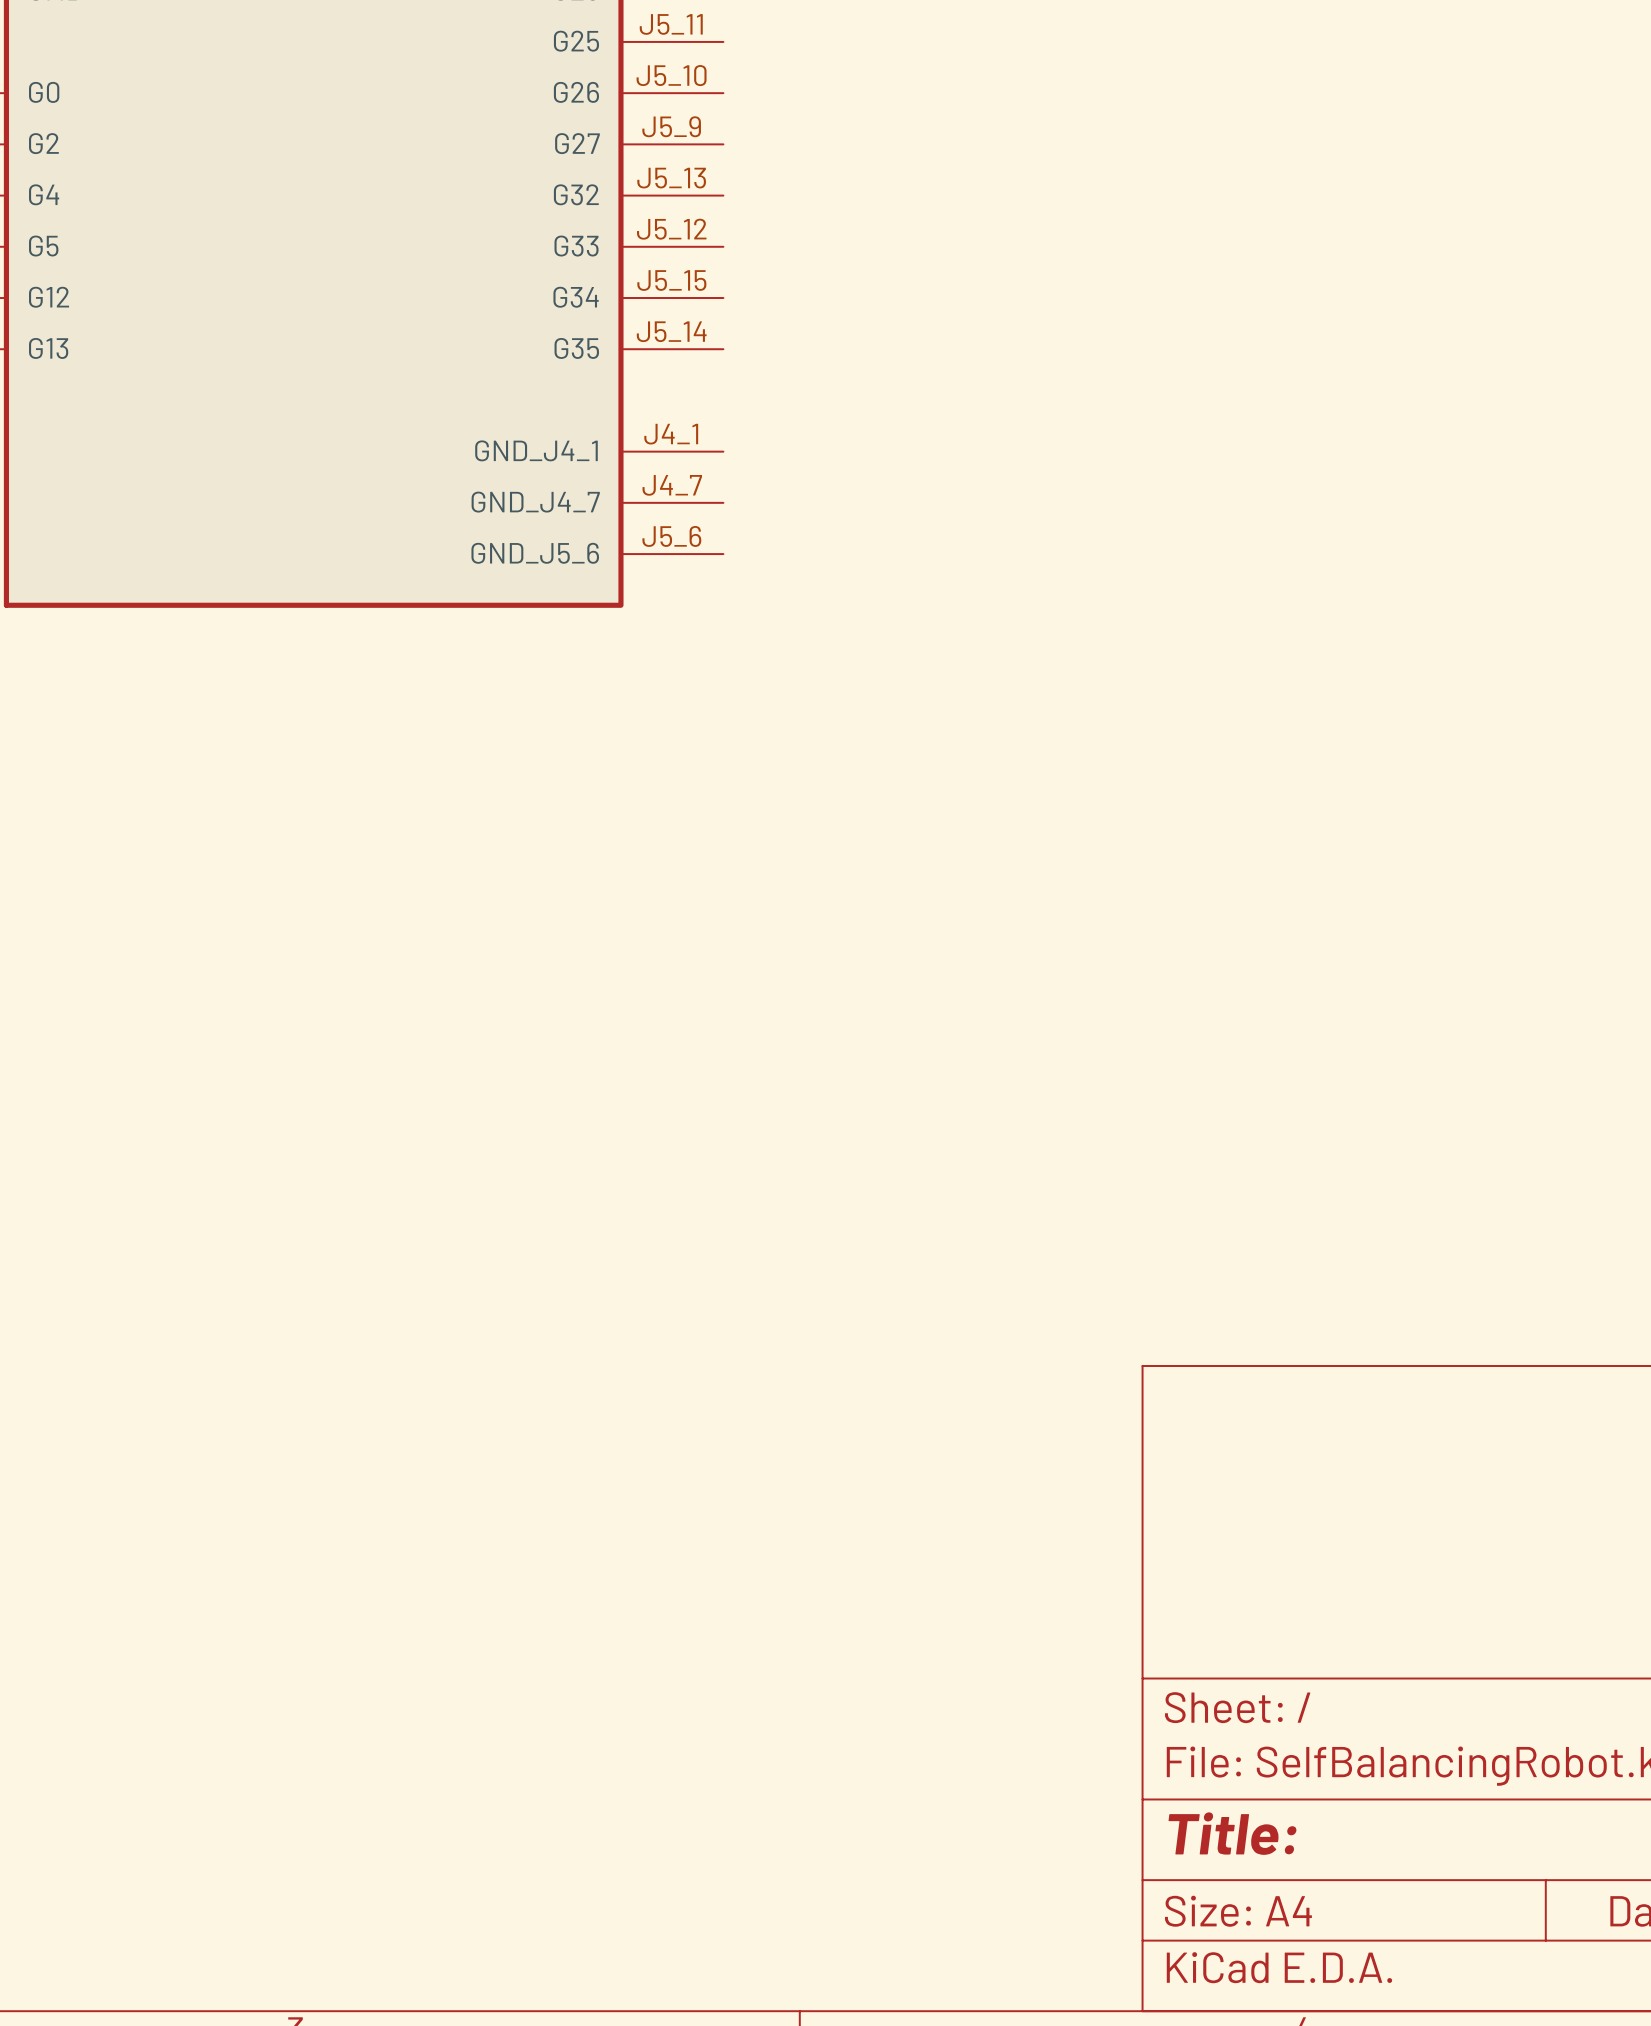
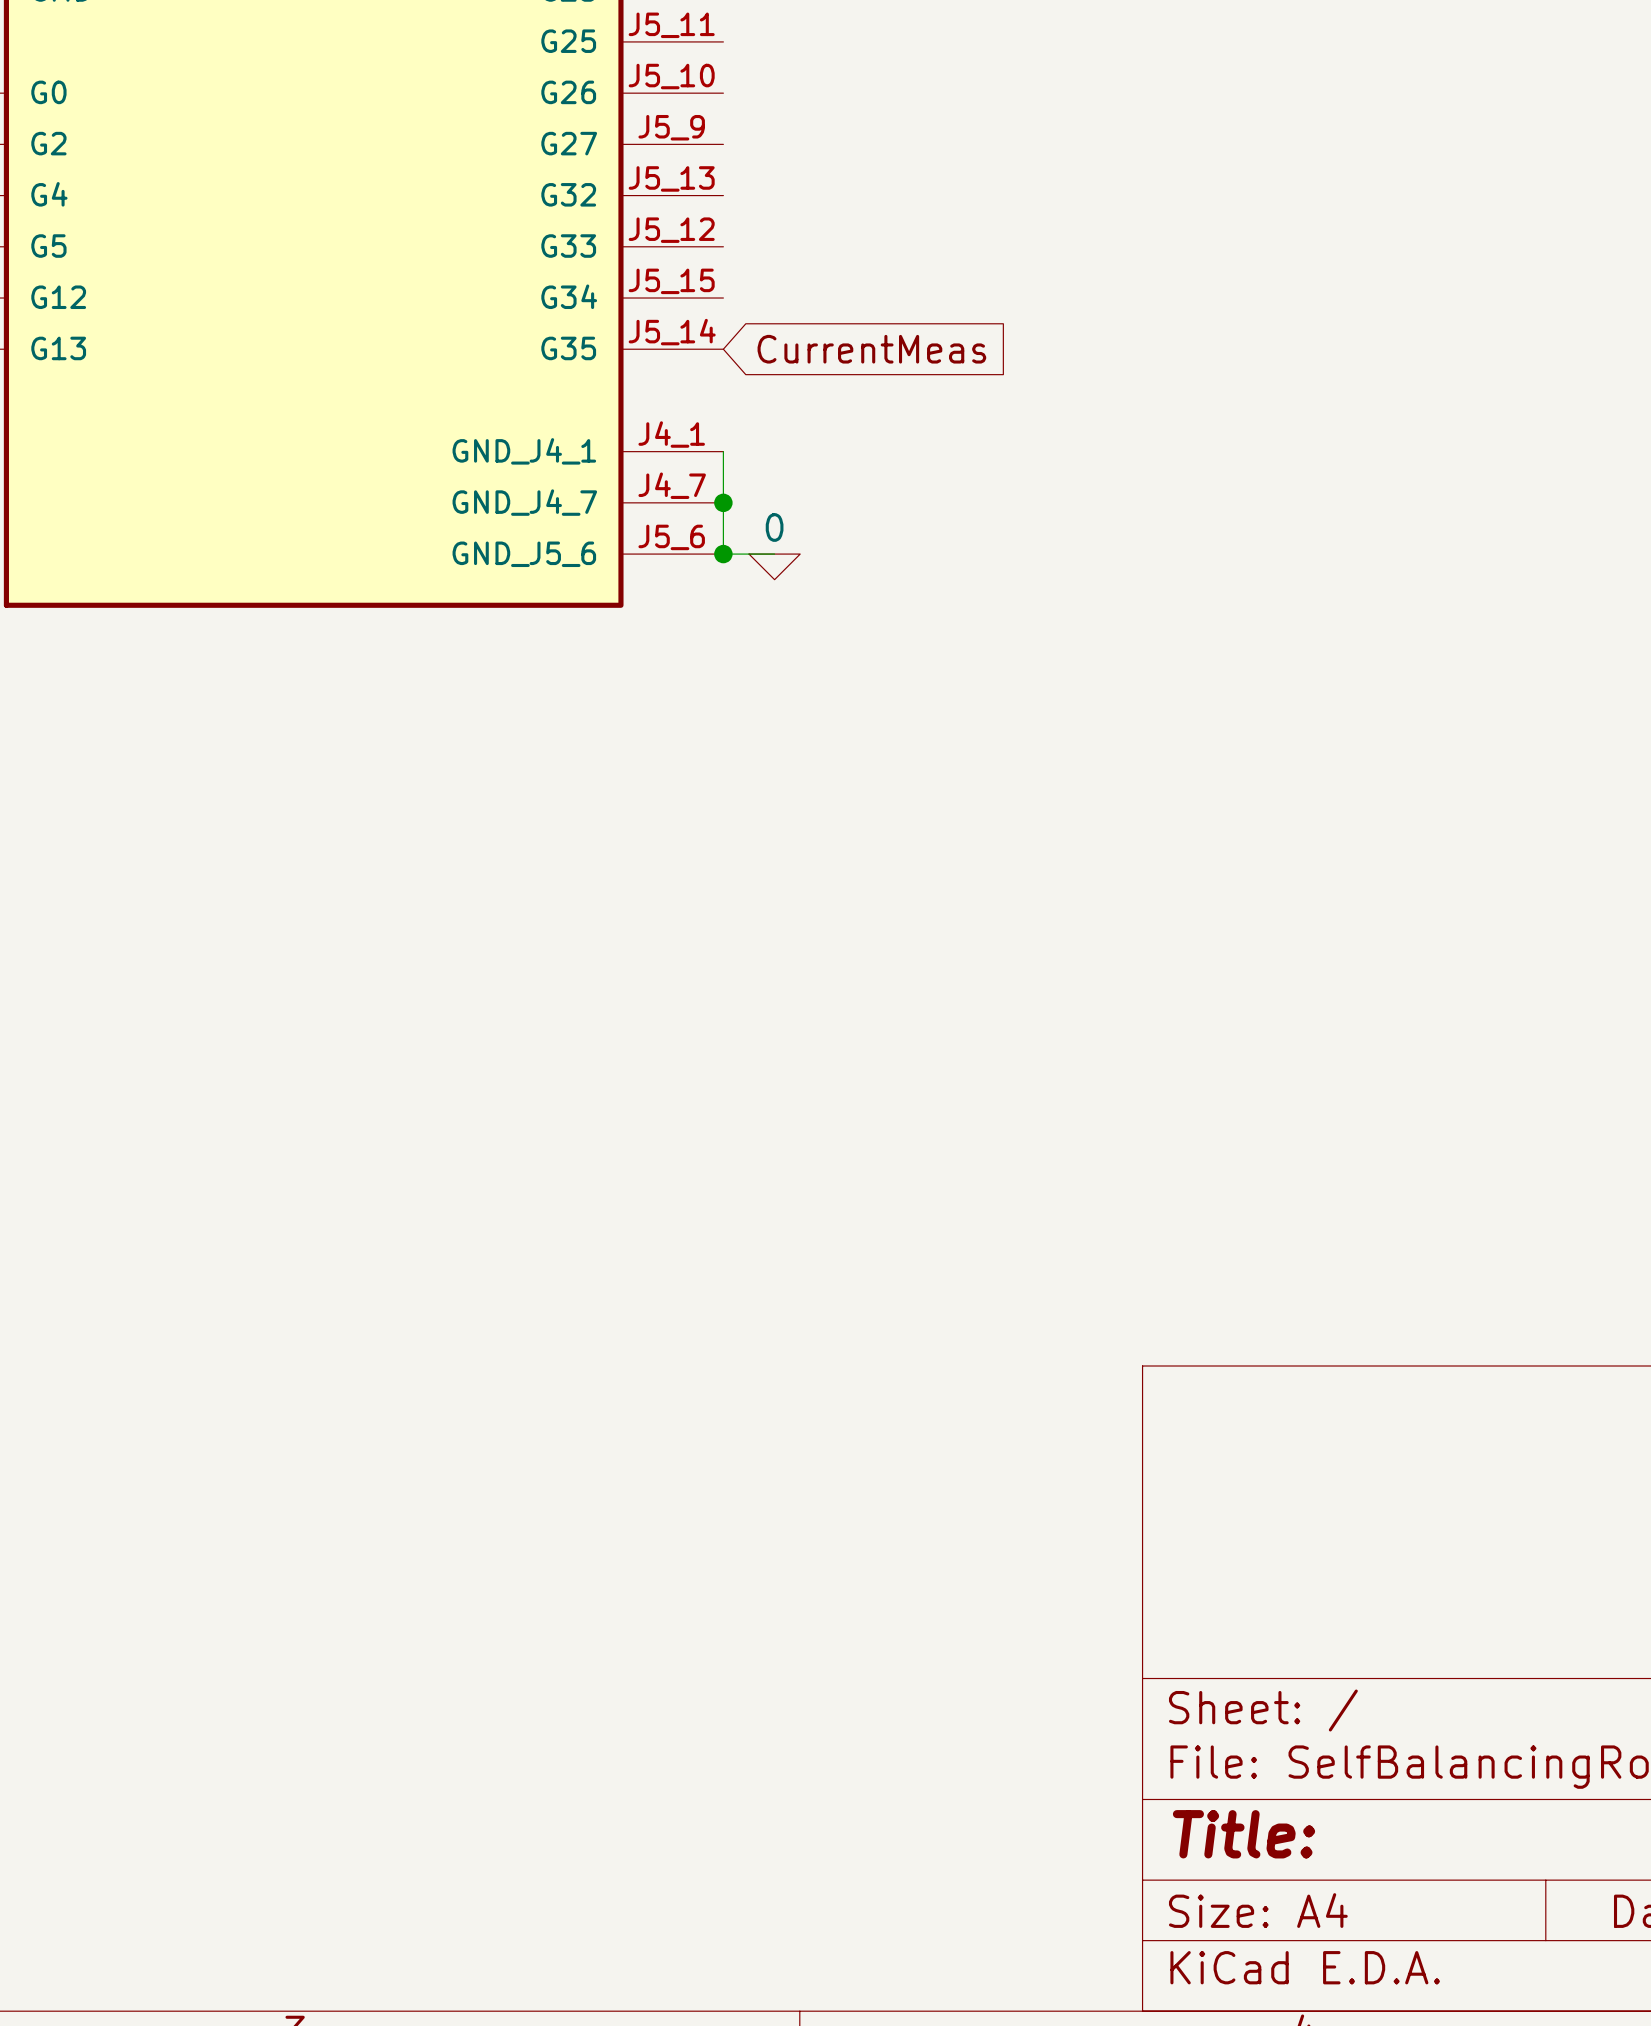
global label: none -> CurrentMeas (871, 349)
wire: none -> (723, 451) (723, 554) (774, 554)
junction: none -> (723, 502)
junction: none -> (723, 554)
power symbol: none -> 0 (774, 566)

